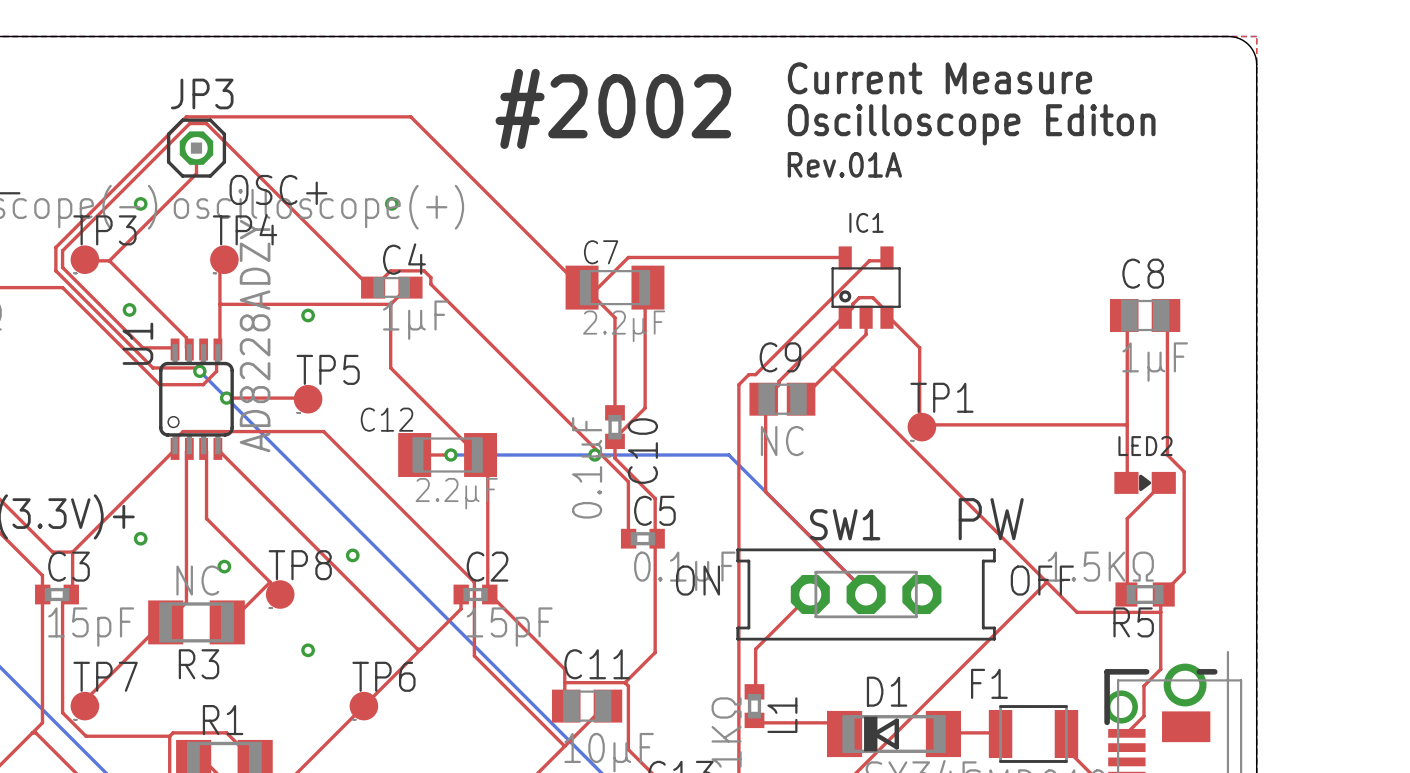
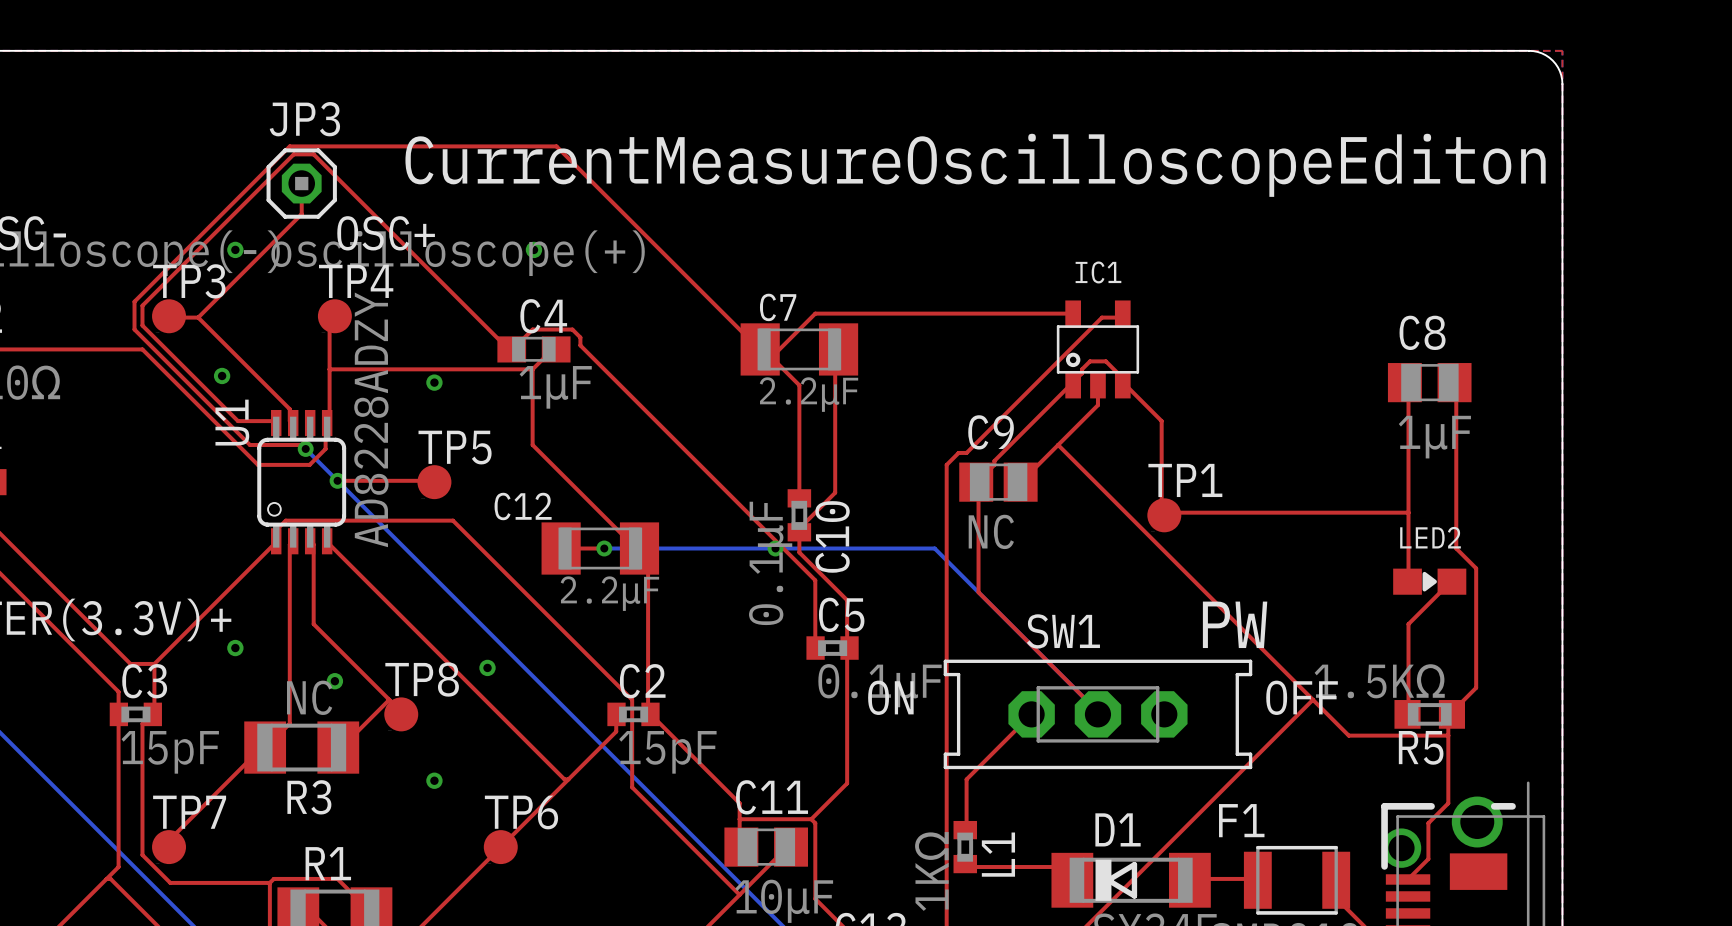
text: Current Measure (940, 78) -> none
text: #2002 (613, 108) -> none
text: Oscilloscope Editon (971, 124) -> CurrentMeasureOscilloscopeEditon (975, 165)
text: Rev.01A (844, 164) -> none

